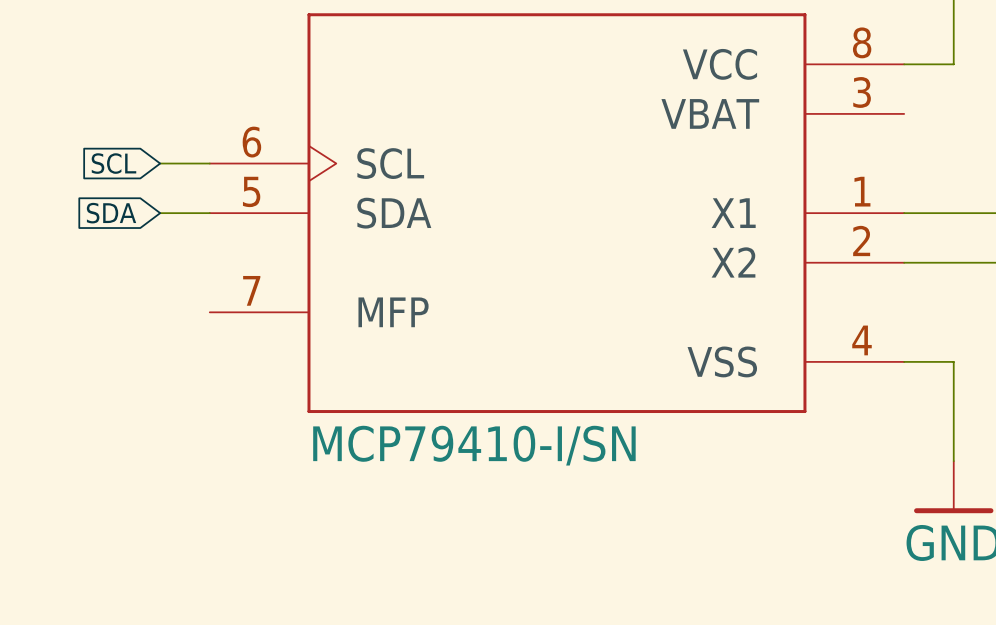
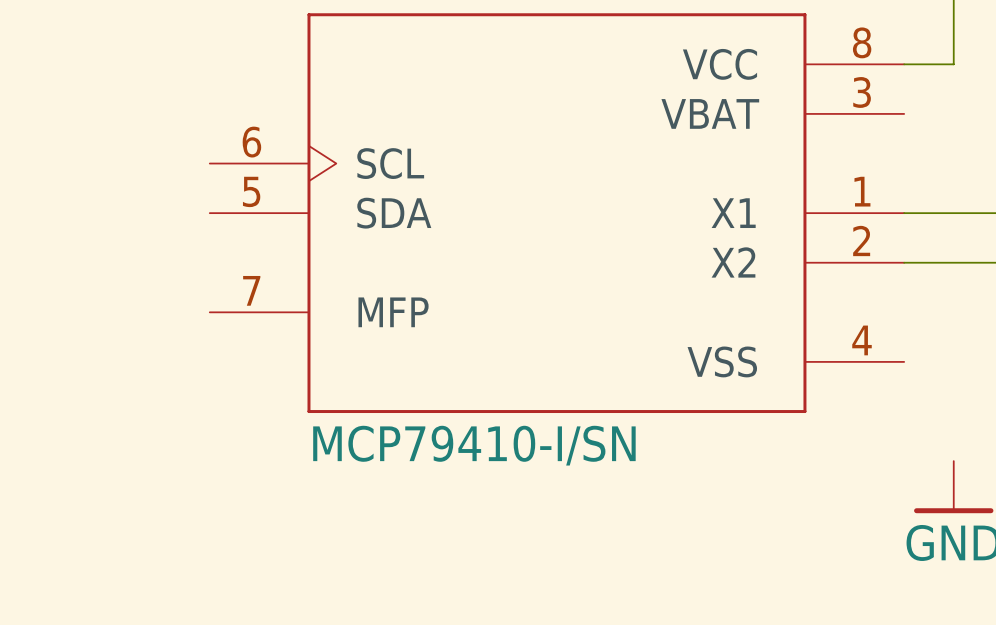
global label: SCL (113, 163) -> none
wire: (160, 163) (209, 163) -> none
global label: SDA (111, 213) -> none
wire: (160, 213) (209, 213) -> none
wire: (904, 361) (953, 361) (953, 461) -> none

